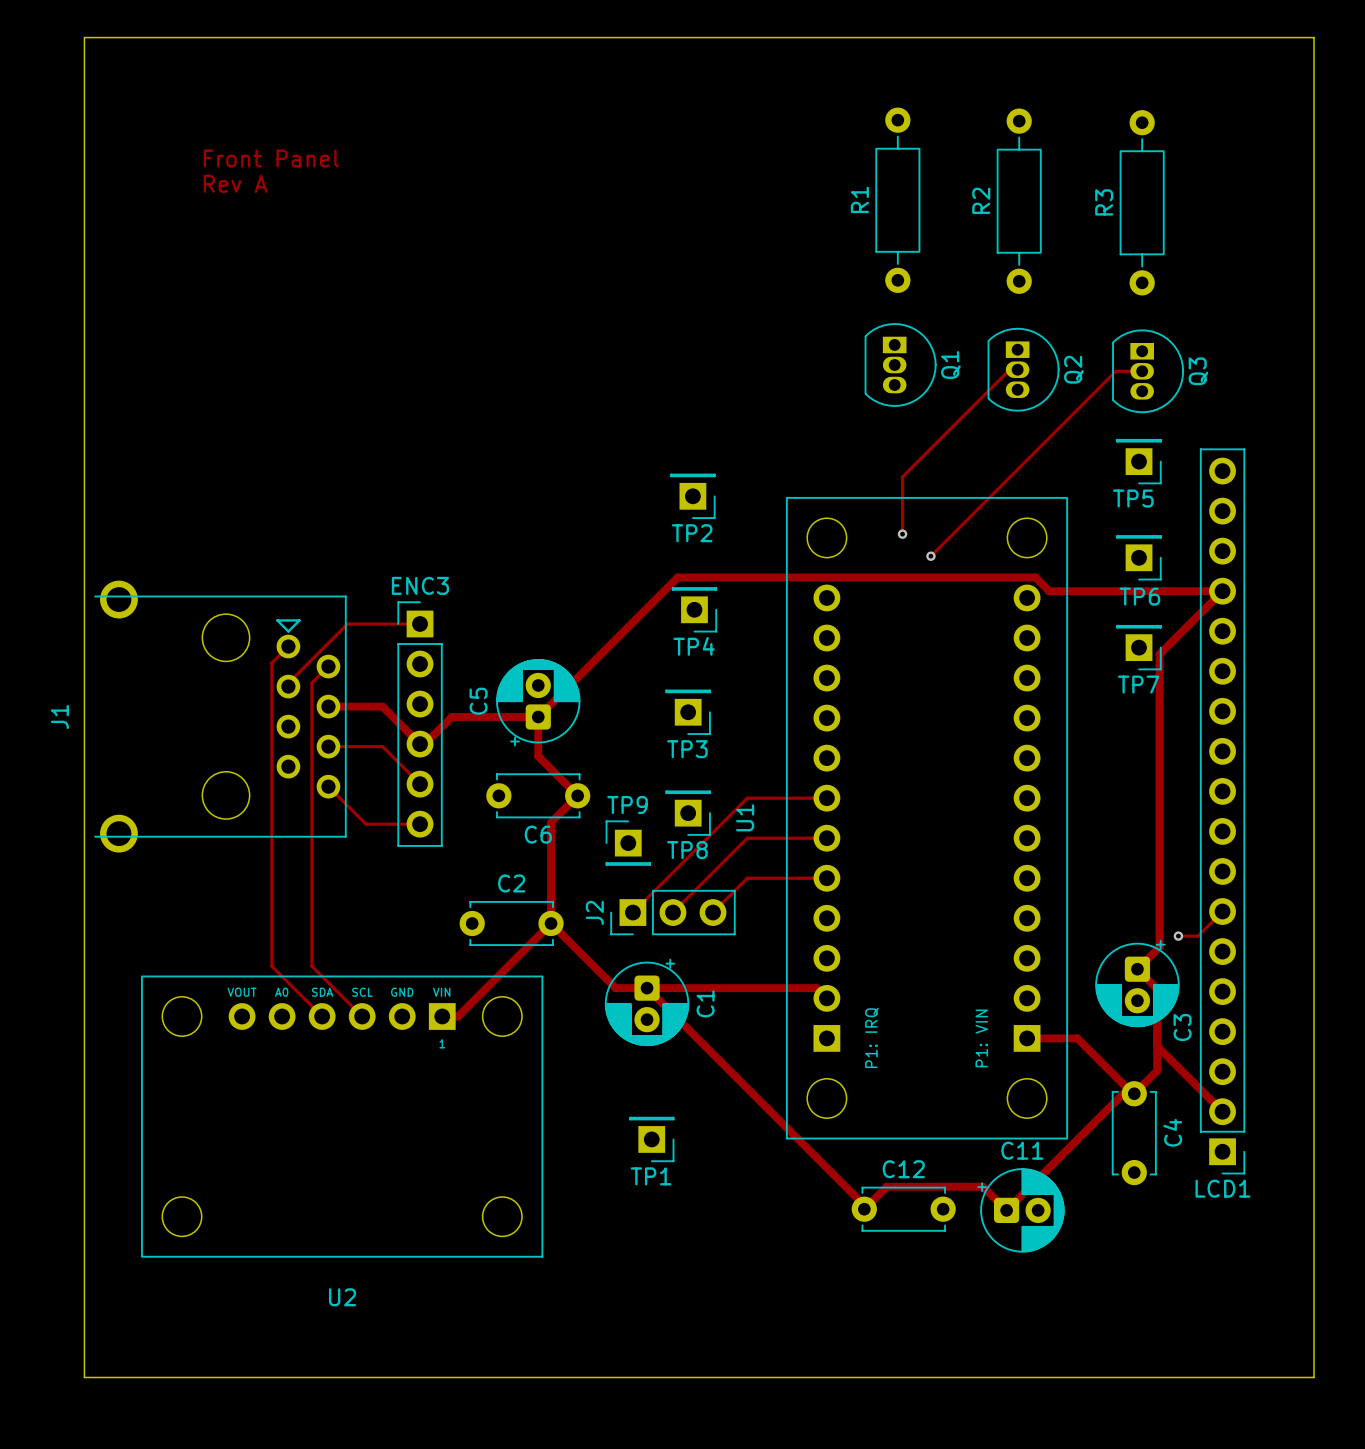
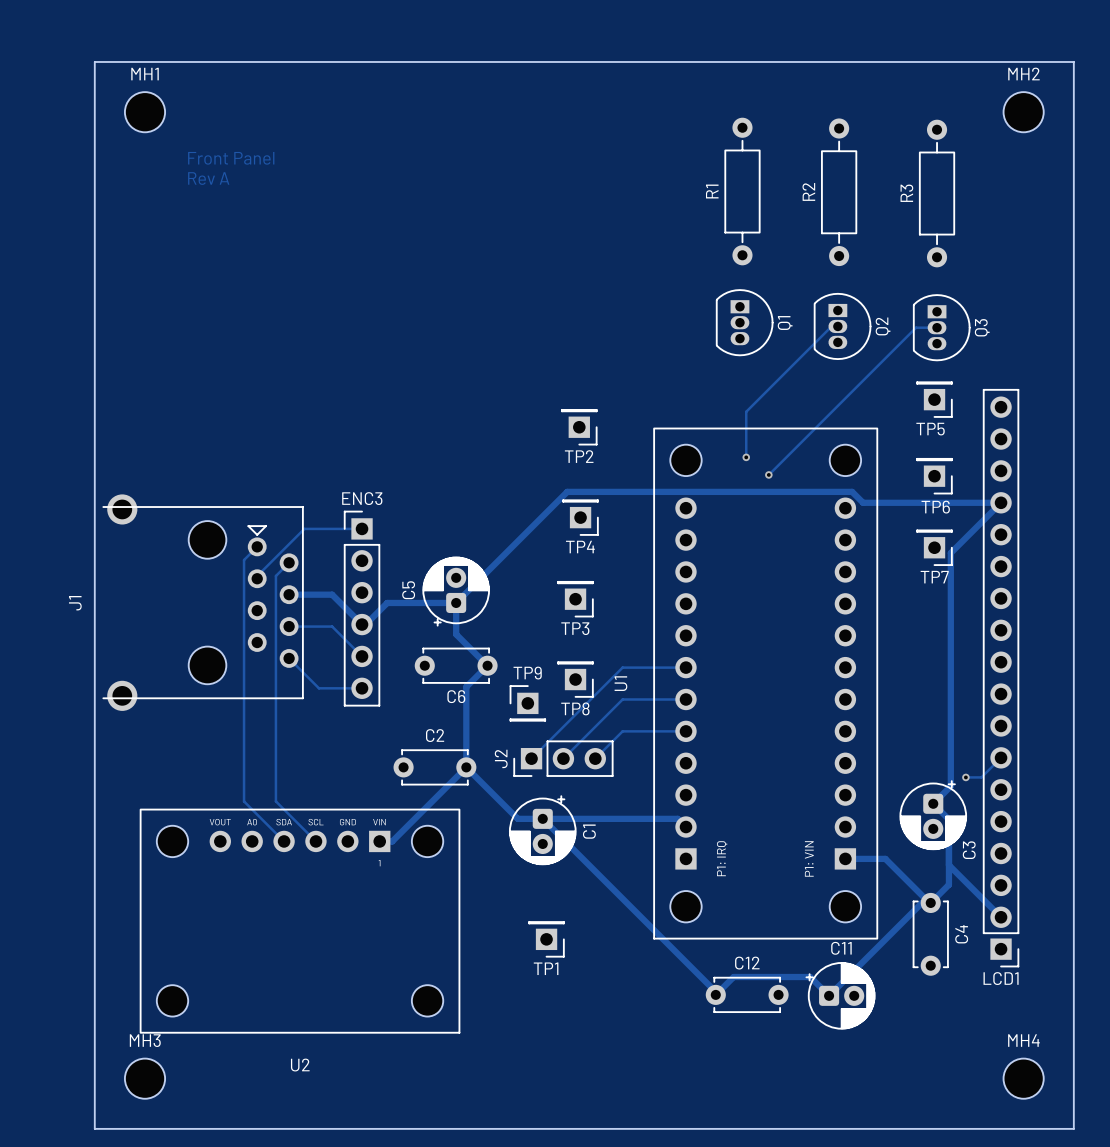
MH1: none -> (145, 112)
MH2: none -> (1023, 112)
MH3: none -> (145, 1078)
MH4: none -> (1023, 1078)

